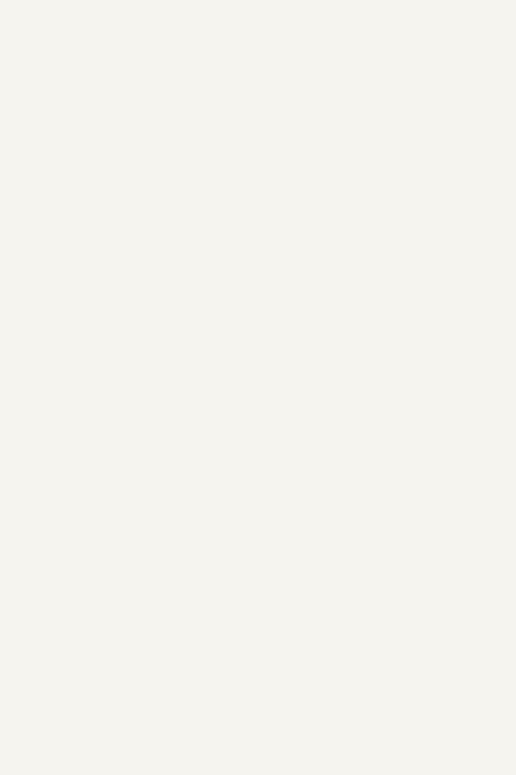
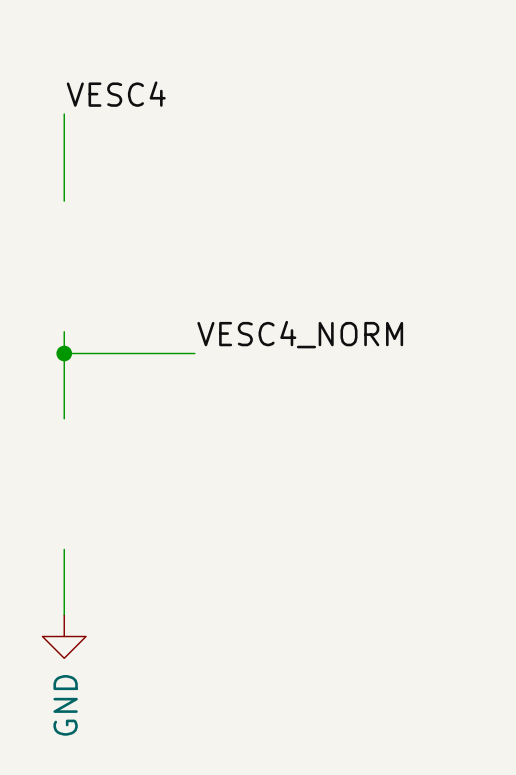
label: none -> VESC4 (116, 94)
wire: none -> (64, 114) (64, 201)
wire: none -> (64, 331) (64, 418)
label: none -> VESC4_NORM (300, 334)
wire: none -> (64, 353) (194, 353)
junction: none -> (64, 353)
wire: none -> (64, 549) (64, 614)
power symbol: none -> GND (64, 636)

